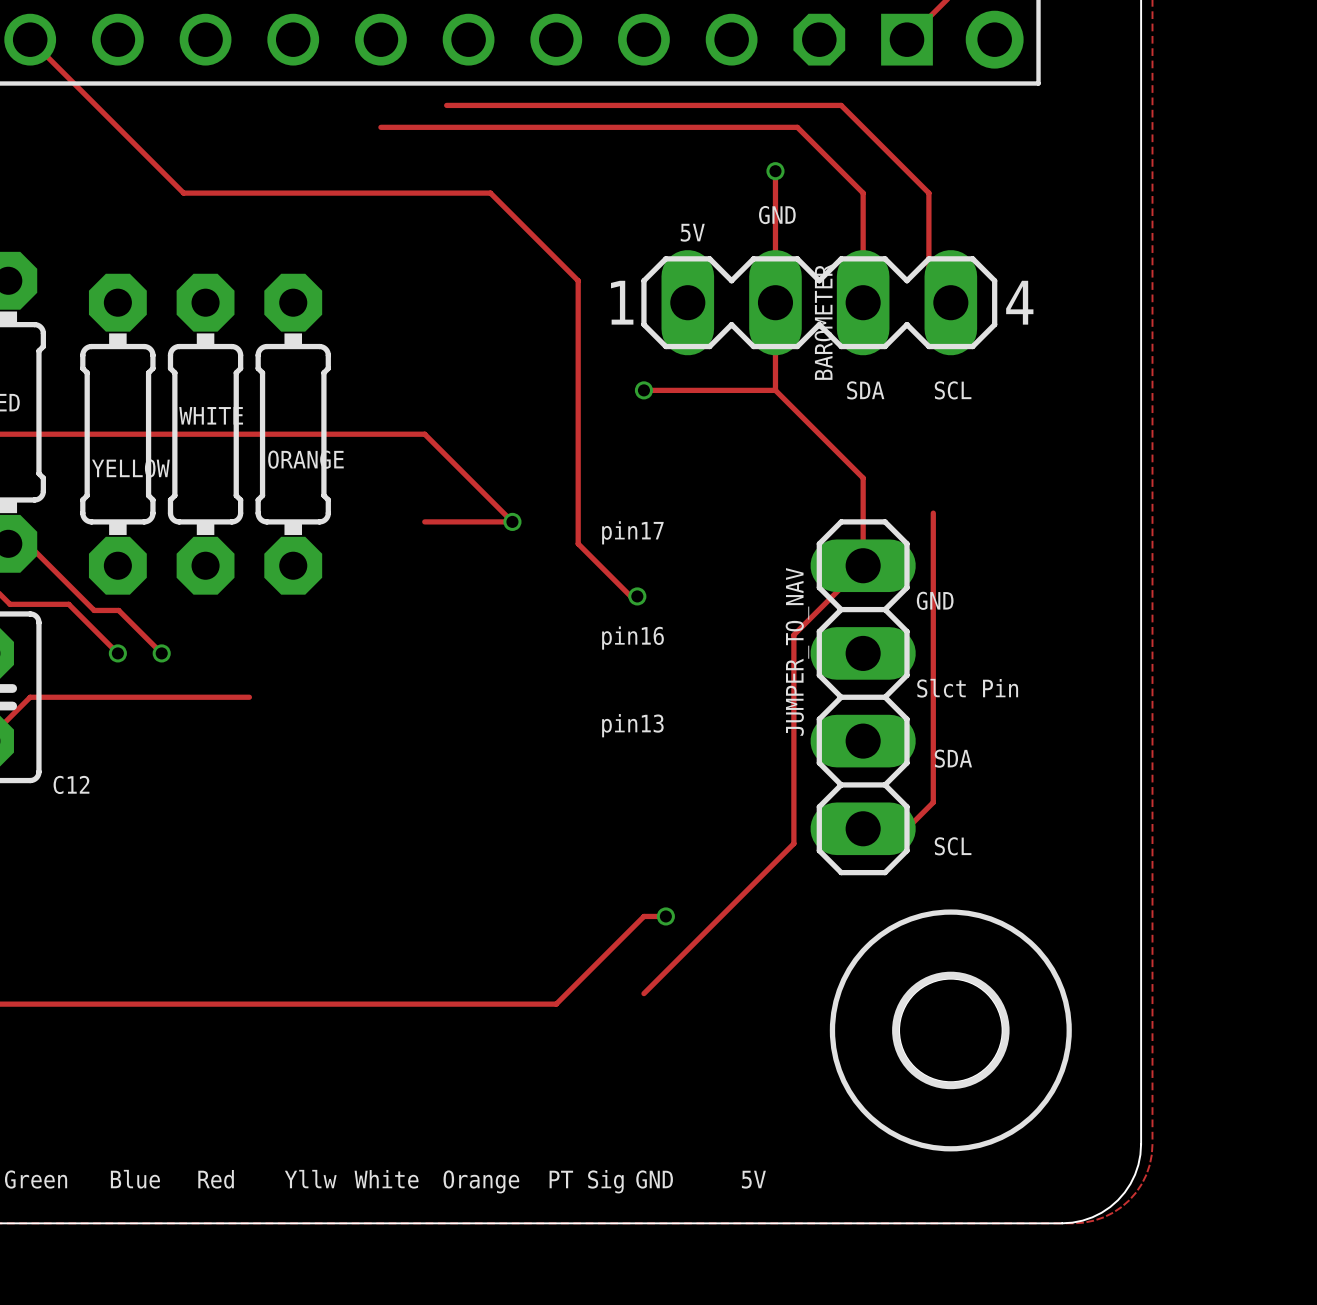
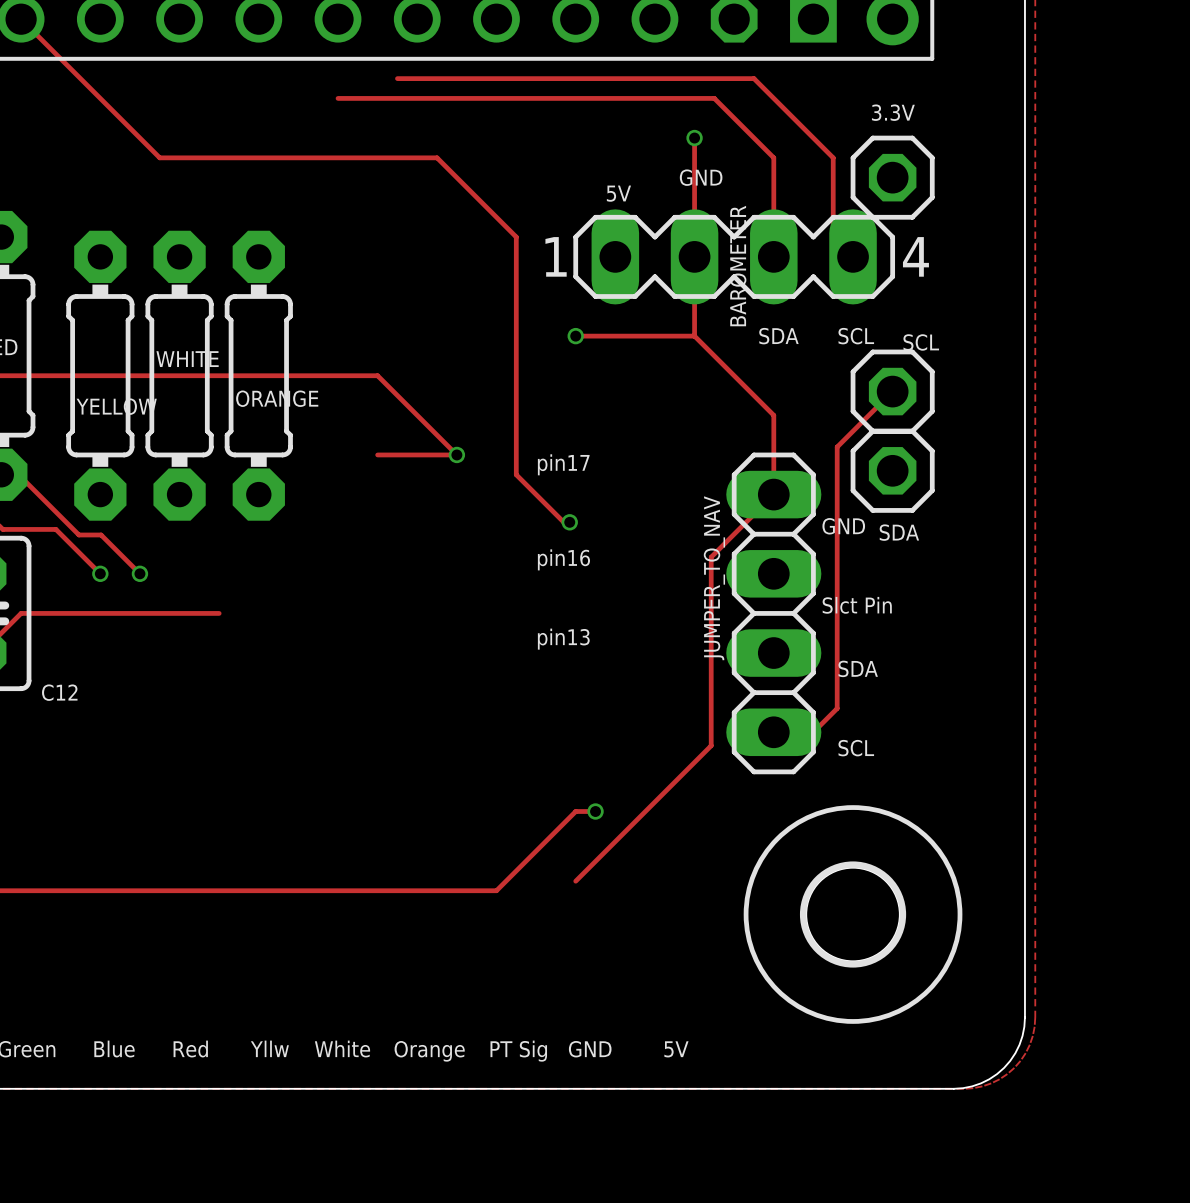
3.3V: none -> (892, 177)
track: none -> (892, 391) (837, 447)
SCL: none -> (892, 391)
SDA: none -> (892, 470)

